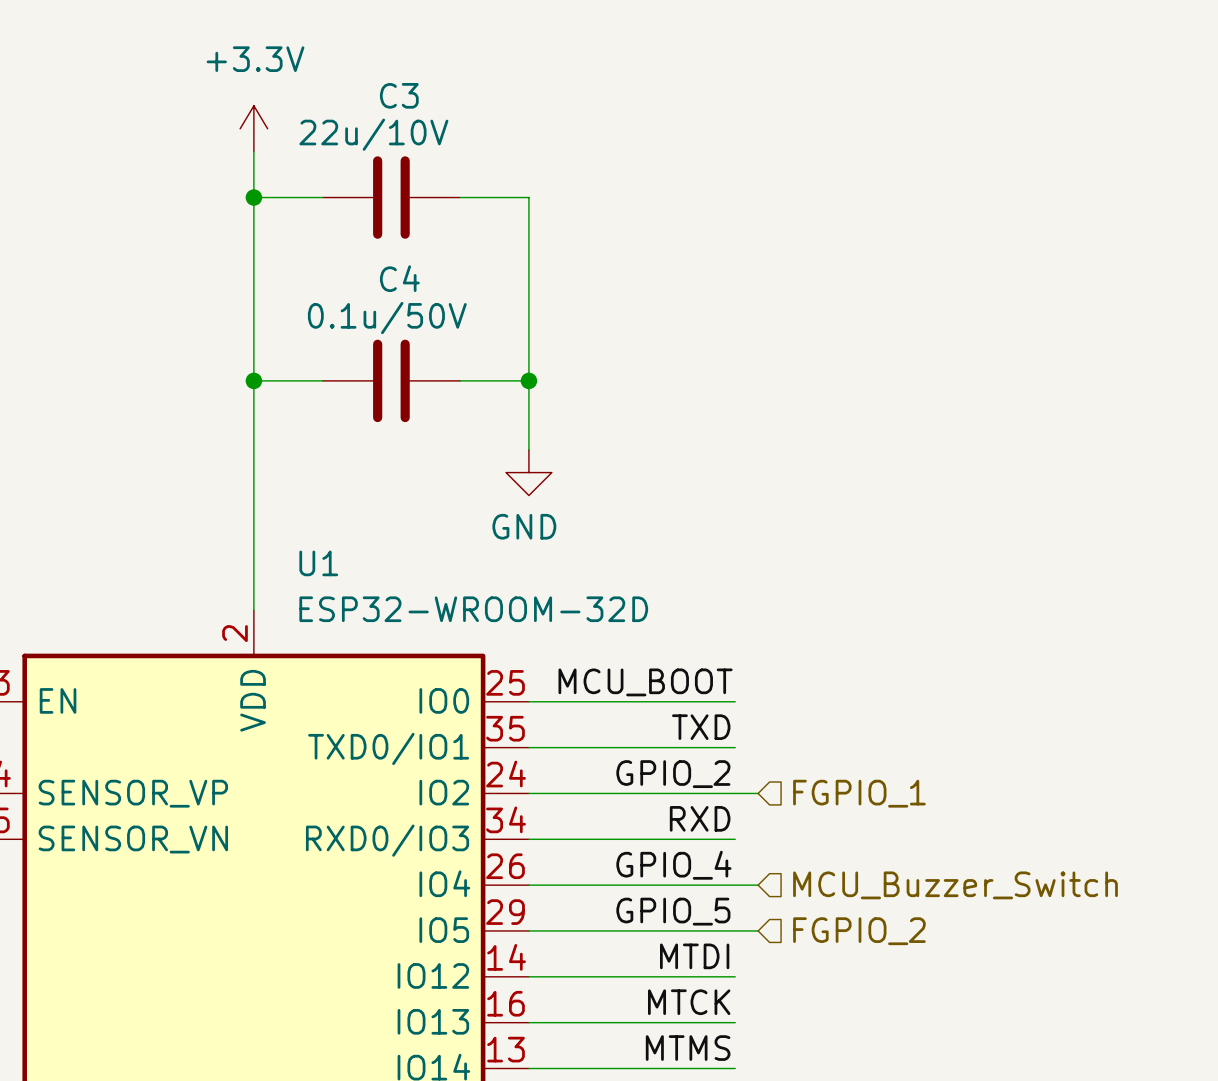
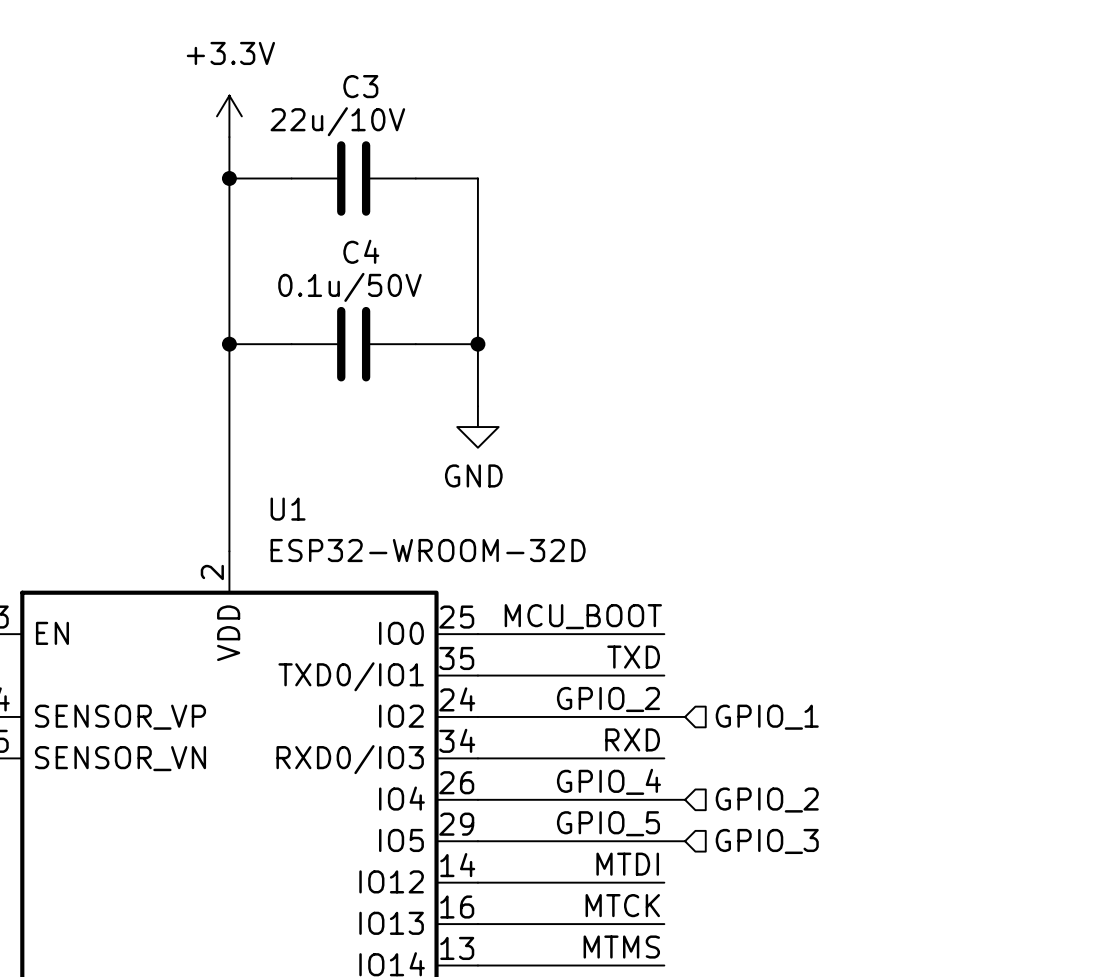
hierarchical label: FGPIO_1 (859, 793) -> GPIO_1 (767, 717)
hierarchical label: MCU_Buzzer_Switch (955, 885) -> GPIO_2 (767, 800)
hierarchical label: FGPIO_2 (859, 931) -> GPIO_3 (767, 841)

